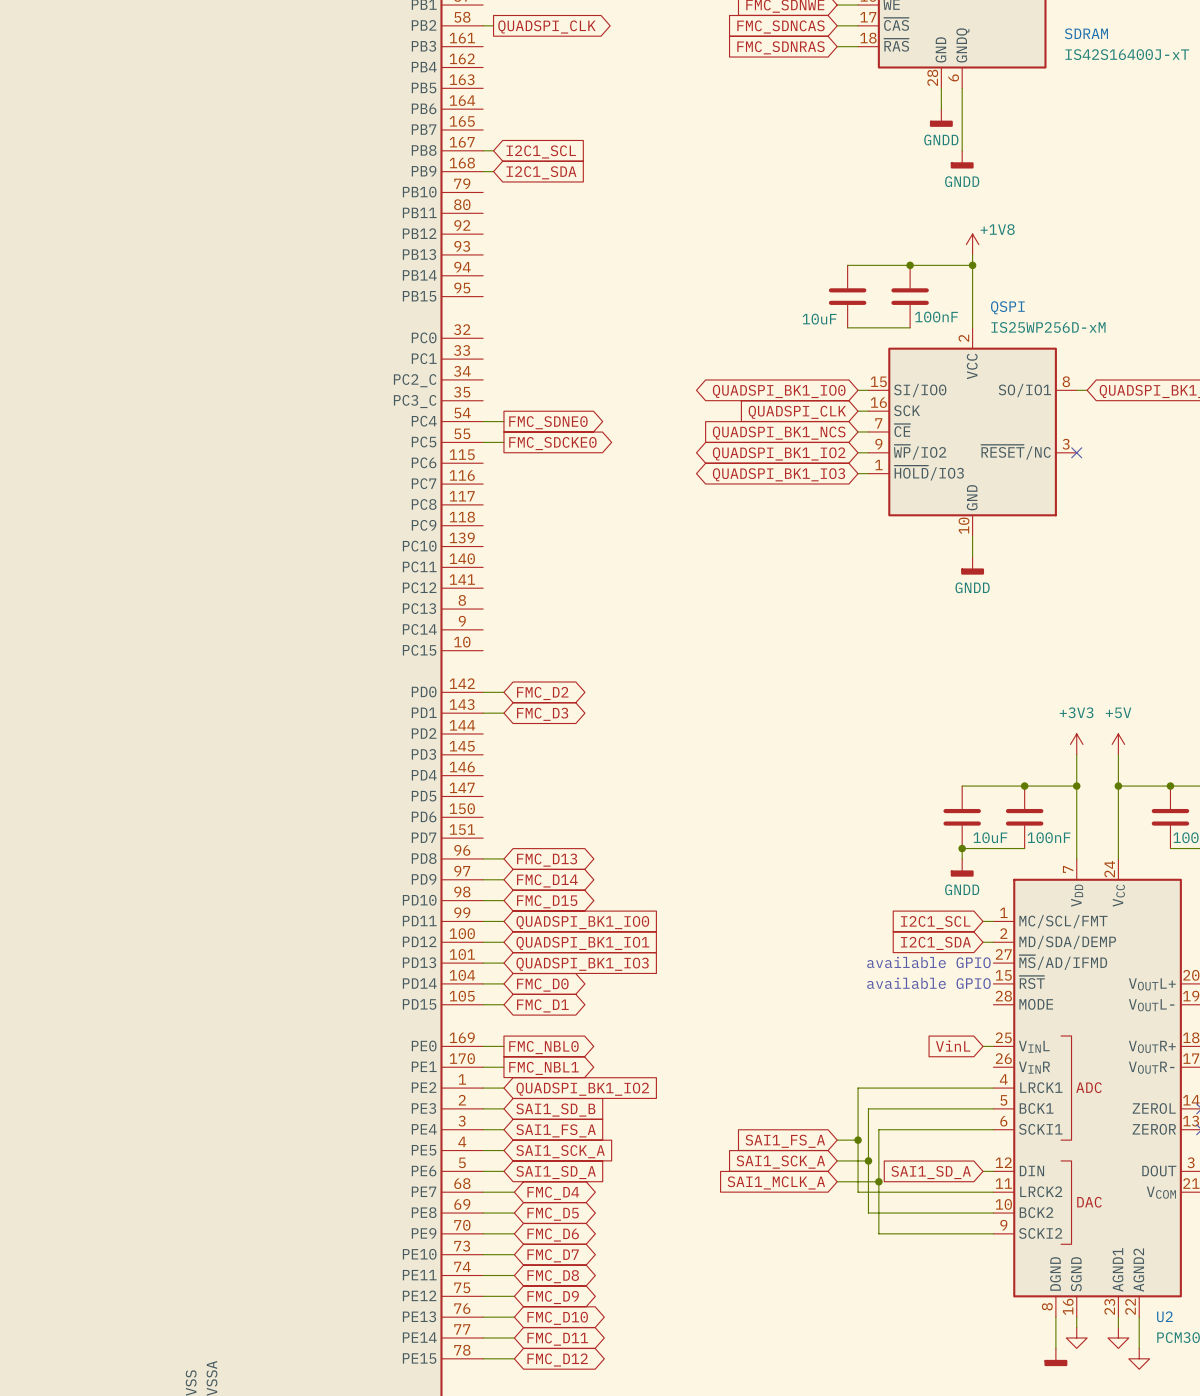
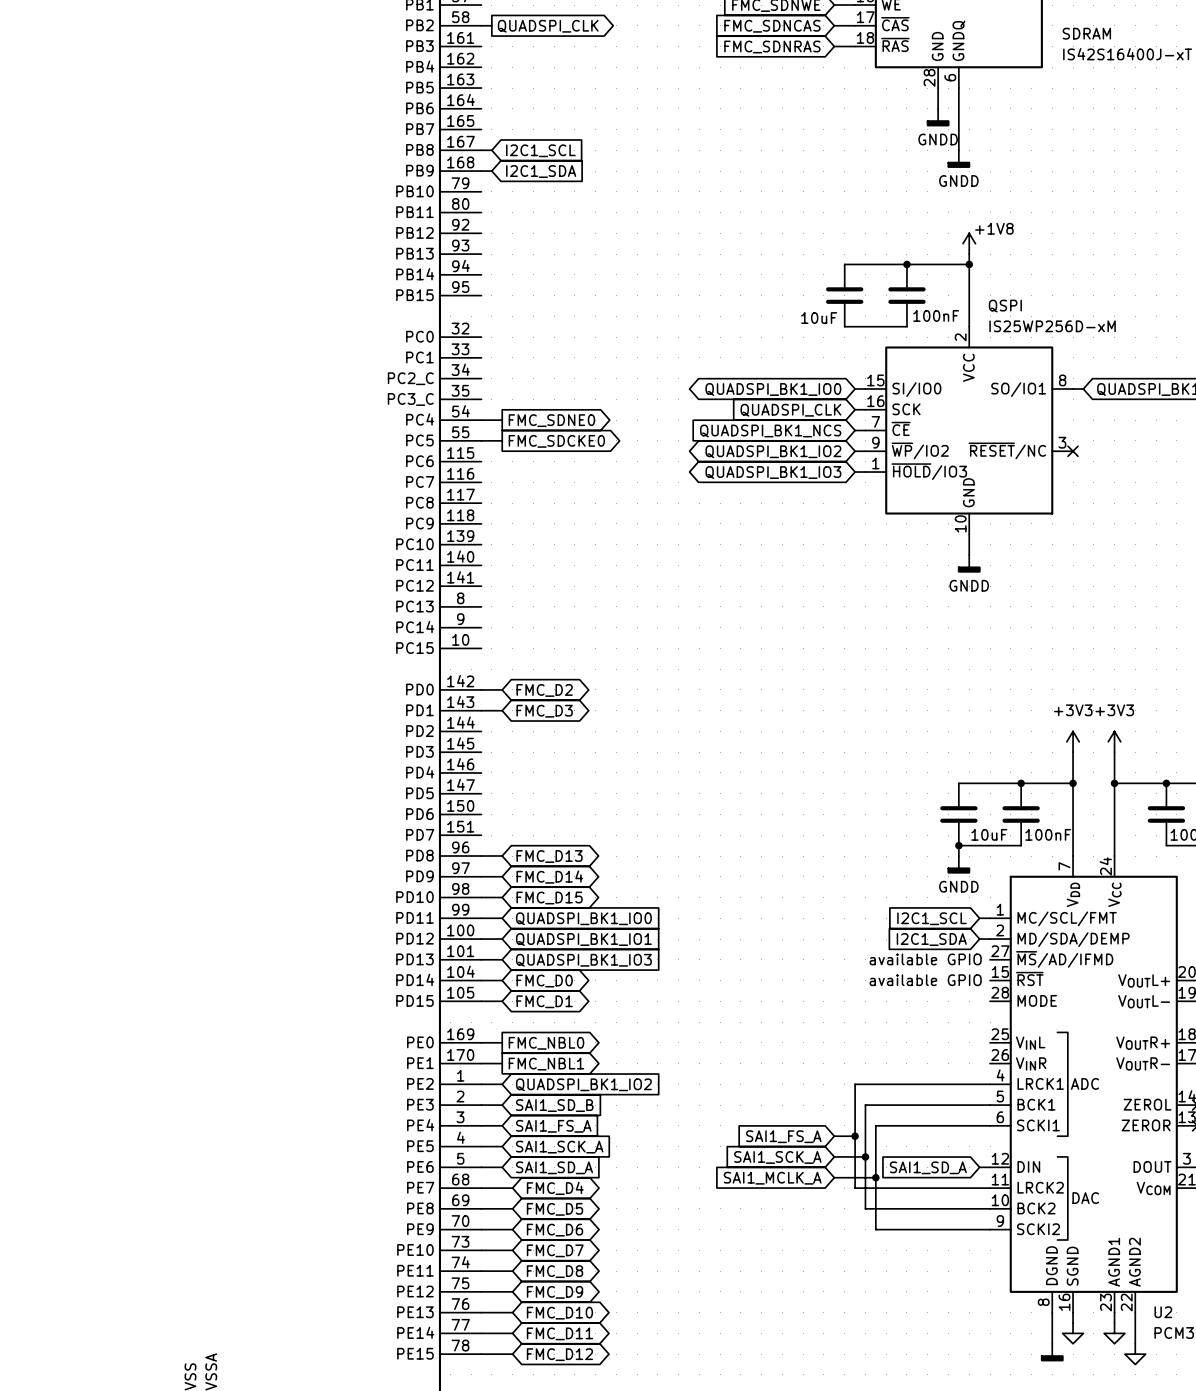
power symbol: +5V (1118, 744) -> +3V3 (1114, 741)
global label: VinL (953, 1046) -> none
wire: (983, 1046) (993, 1046) -> none

